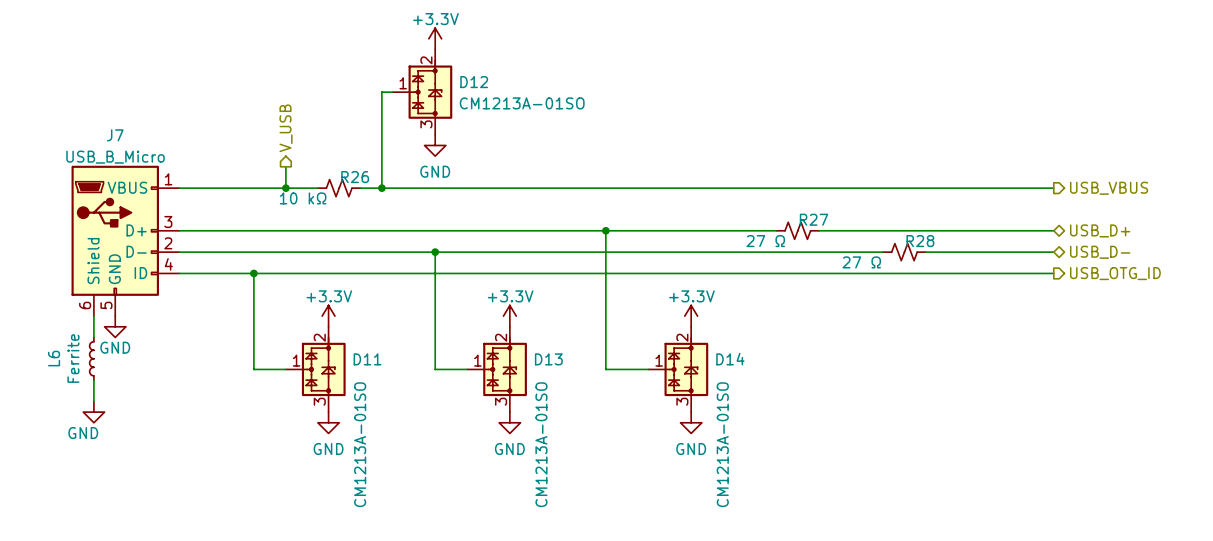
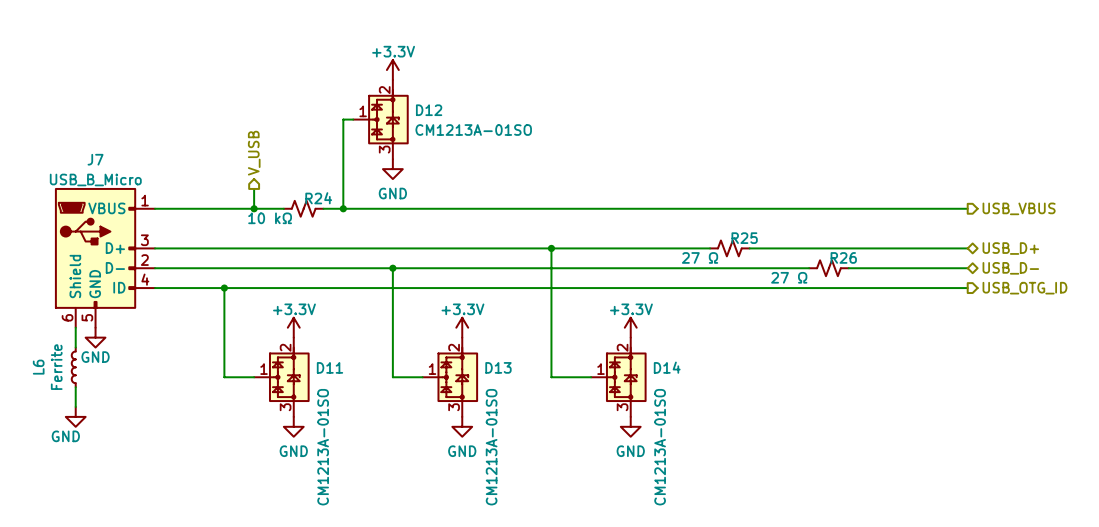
R26 name: R26 (355, 177) -> R24 (318, 198)
R27 name: R27 (814, 219) -> R25 (744, 238)
R28 name: R28 (920, 241) -> R26 (843, 257)

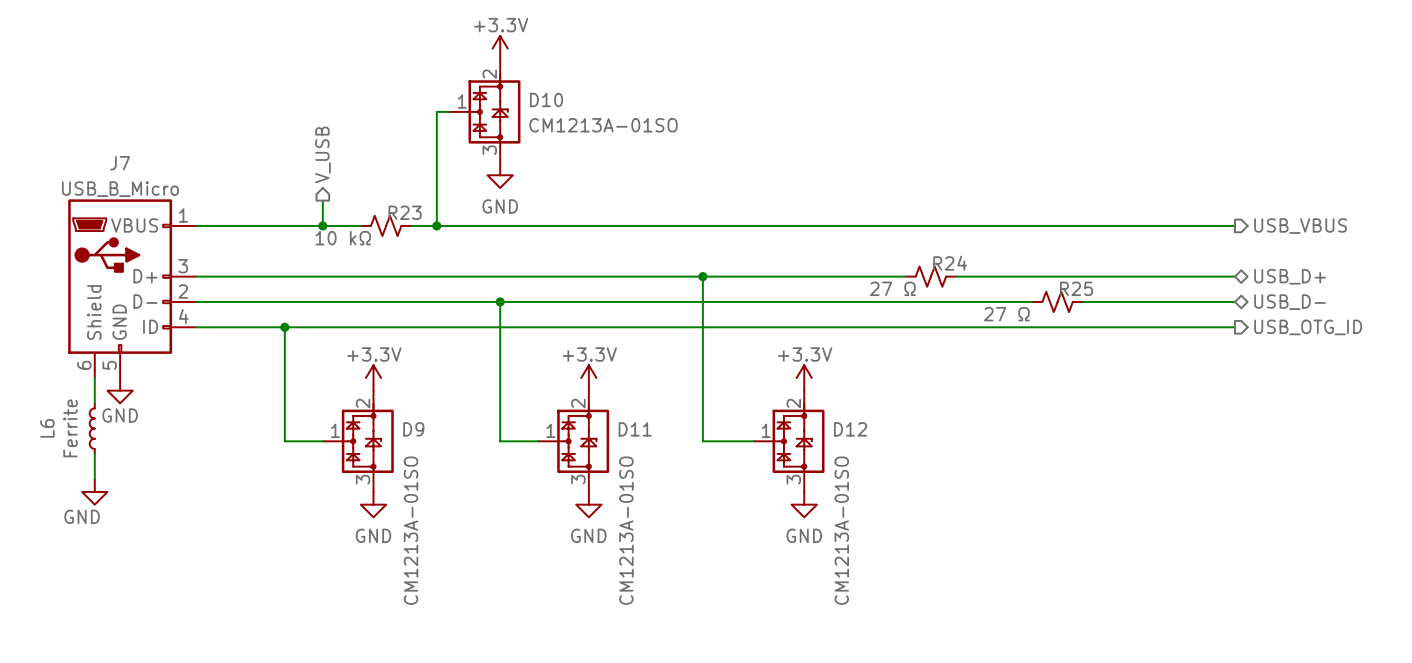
D12 name: D12 (429, 110) -> D10 (546, 99)
R24 name: R24 (318, 198) -> R23 (405, 212)
R25 name: R25 (744, 238) -> R24 (950, 263)
R26 name: R26 (843, 257) -> R25 (1076, 288)
D11 name: D11 (329, 367) -> D9 (413, 429)
D13 name: D13 (498, 367) -> D11 (635, 429)
D14 name: D14 (667, 367) -> D12 (850, 429)

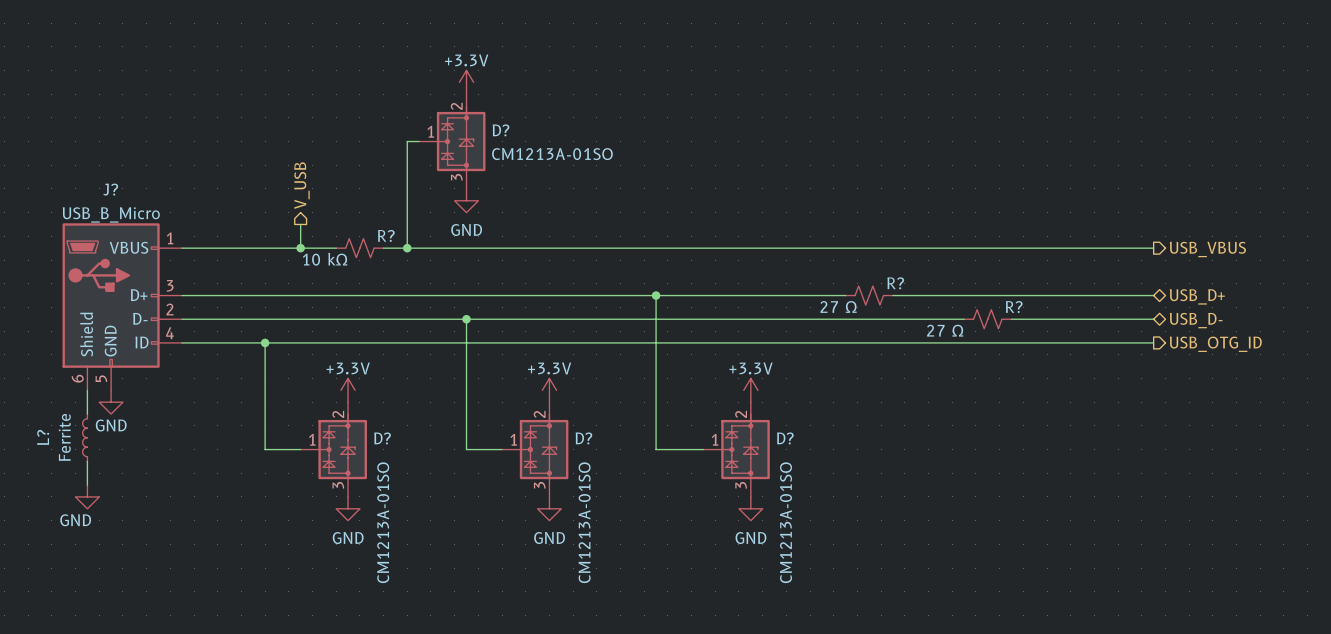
D10 name: D10 (546, 99) -> D? (501, 130)
J7 name: J7 (120, 163) -> J? (110, 189)
R23 name: R23 (405, 212) -> R? (386, 235)
R24 name: R24 (950, 263) -> R? (895, 283)
R25 name: R25 (1076, 288) -> R? (1014, 307)
L6 name: L6 (47, 428) -> L? (43, 437)
D9 name: D9 (413, 429) -> D? (382, 438)
D11 name: D11 (635, 429) -> D? (583, 438)
D12 name: D12 (850, 429) -> D? (785, 438)

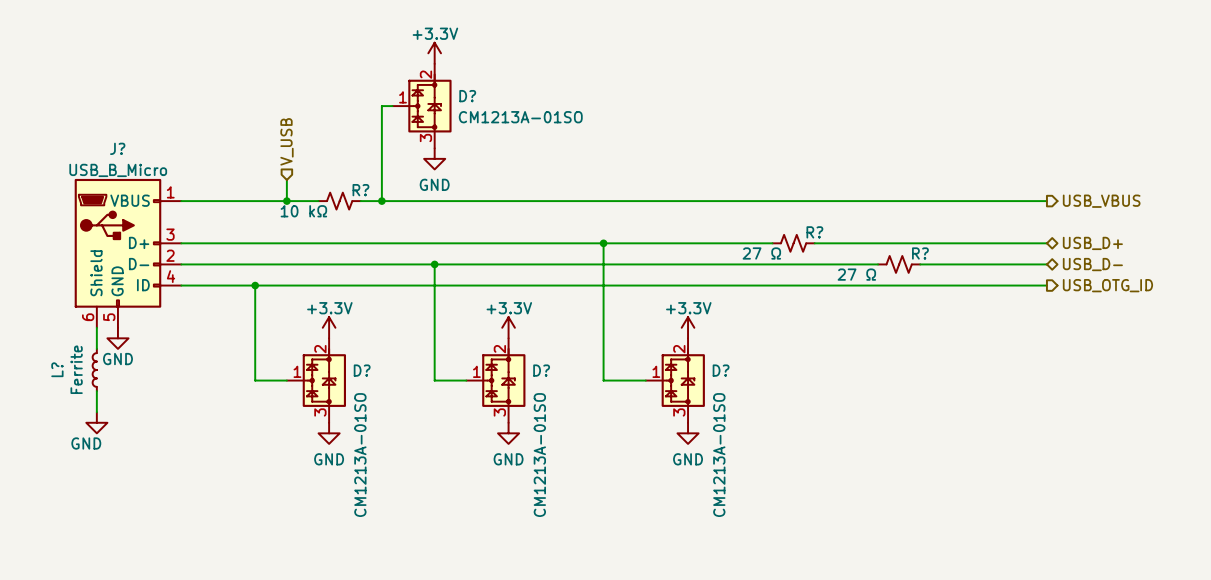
hierarchical label shape: output (301, 185) -> input (286, 141)

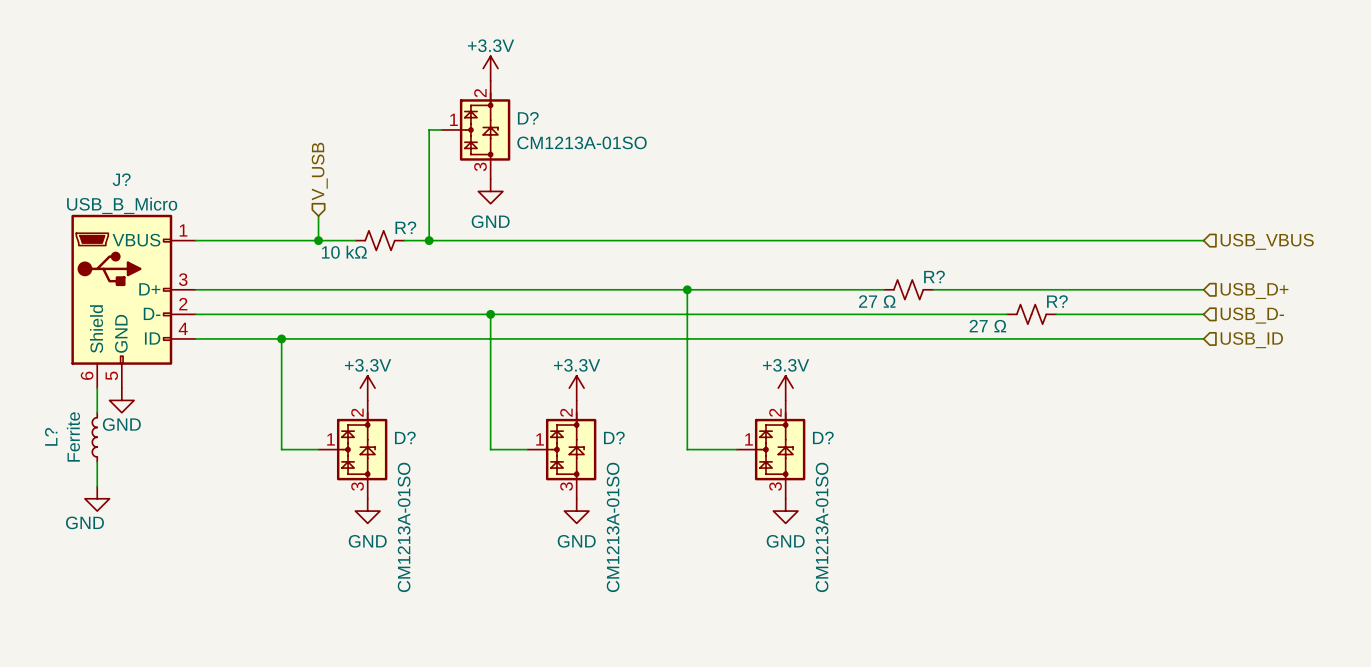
hierarchical label shape: output (1101, 201) -> input (1267, 241)
hierarchical label shape: bidirectional (1092, 243) -> input (1254, 291)
hierarchical label shape: bidirectional (1092, 264) -> input (1252, 315)
hierarchical label shape: output (1107, 285) -> input (1251, 340)
hierarchical label: USB_OTG_ID (1107, 285) -> USB_ID (1251, 340)

